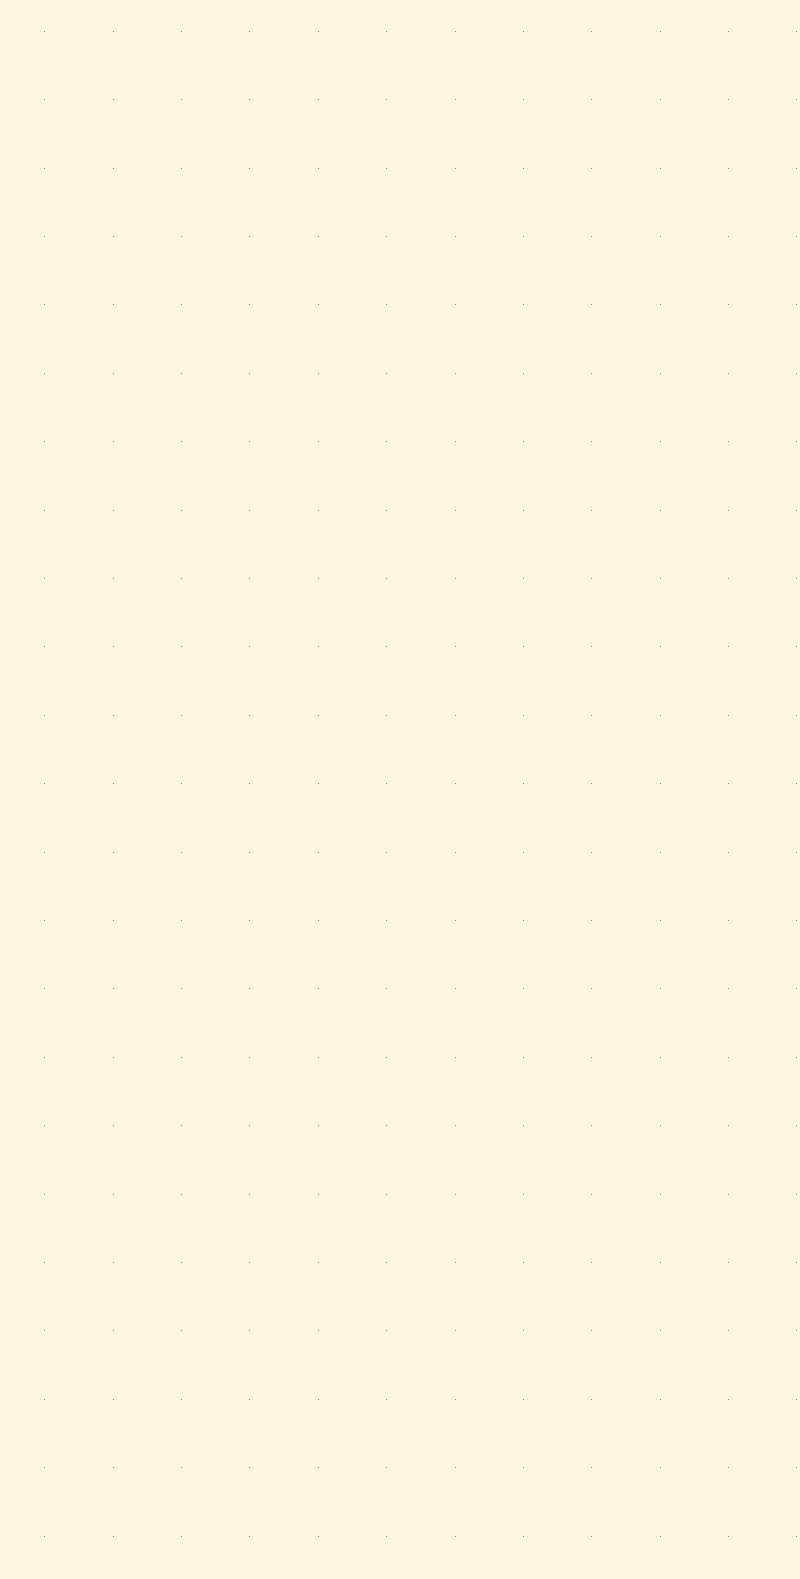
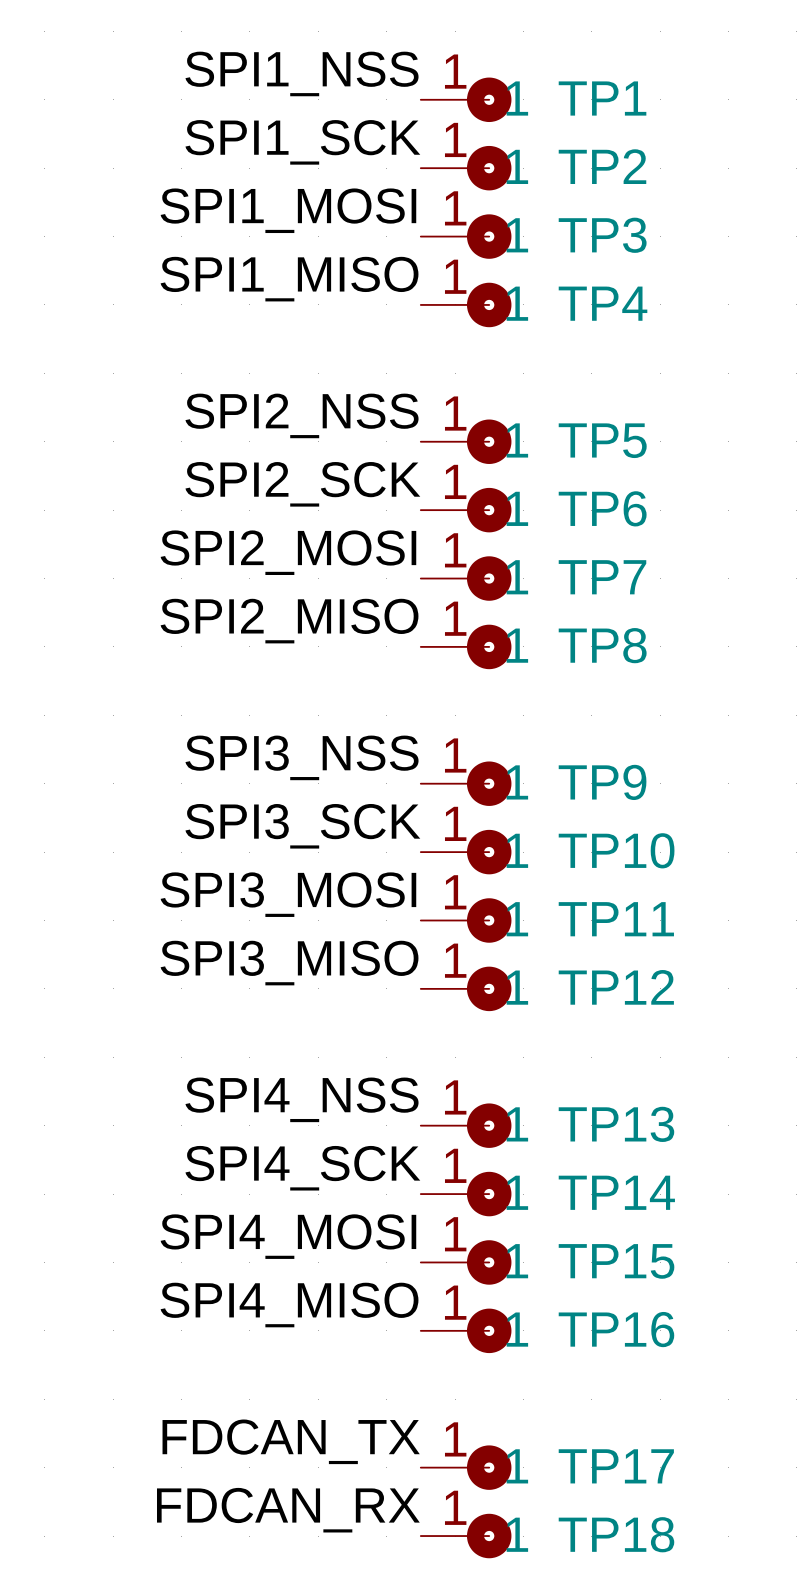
label: none -> SPI1_NSS (302, 73)
TP1: none -> (466, 99)
label: none -> SPI1_SCK (302, 142)
TP2: none -> (466, 168)
label: none -> SPI1_MOSI (288, 210)
TP3: none -> (466, 236)
label: none -> SPI1_MISO (289, 279)
TP4: none -> (466, 304)
label: none -> SPI2_NSS (302, 415)
TP5: none -> (466, 441)
label: none -> SPI2_SCK (302, 484)
TP6: none -> (466, 510)
label: none -> SPI2_MOSI (288, 552)
TP7: none -> (466, 578)
label: none -> SPI2_MISO (289, 621)
TP8: none -> (466, 646)
label: none -> SPI3_NSS (302, 757)
TP9: none -> (466, 783)
label: none -> SPI3_SCK (302, 826)
TP10: none -> (466, 852)
label: none -> SPI3_MOSI (288, 894)
TP11: none -> (466, 920)
label: none -> SPI3_MISO (289, 963)
TP12: none -> (466, 988)
label: none -> SPI4_NSS (302, 1099)
TP13: none -> (466, 1125)
label: none -> SPI4_SCK (302, 1168)
TP14: none -> (466, 1194)
label: none -> SPI4_MOSI (288, 1236)
TP15: none -> (466, 1262)
label: none -> SPI4_MISO (289, 1305)
TP16: none -> (466, 1330)
label: none -> FDCAN_TX (291, 1441)
TP17: none -> (466, 1467)
label: none -> FDCAN_RX (288, 1510)
TP18: none -> (466, 1536)

